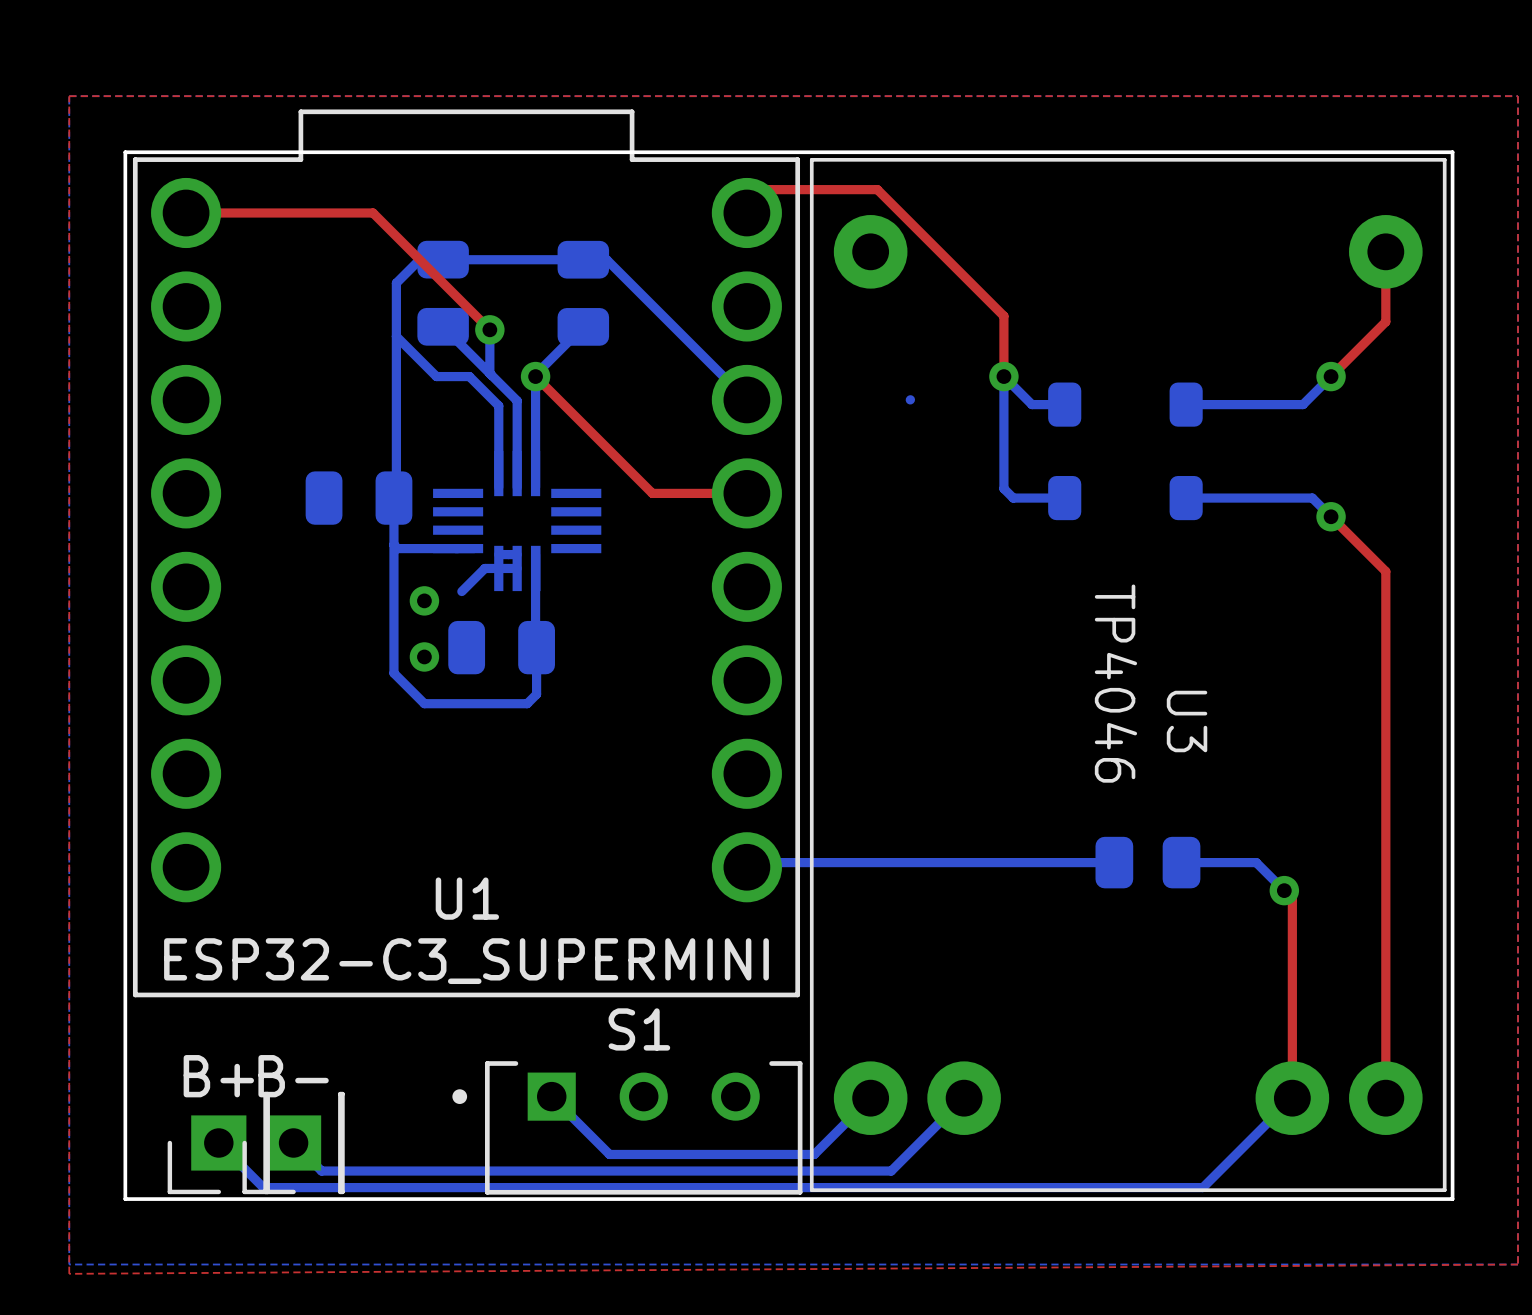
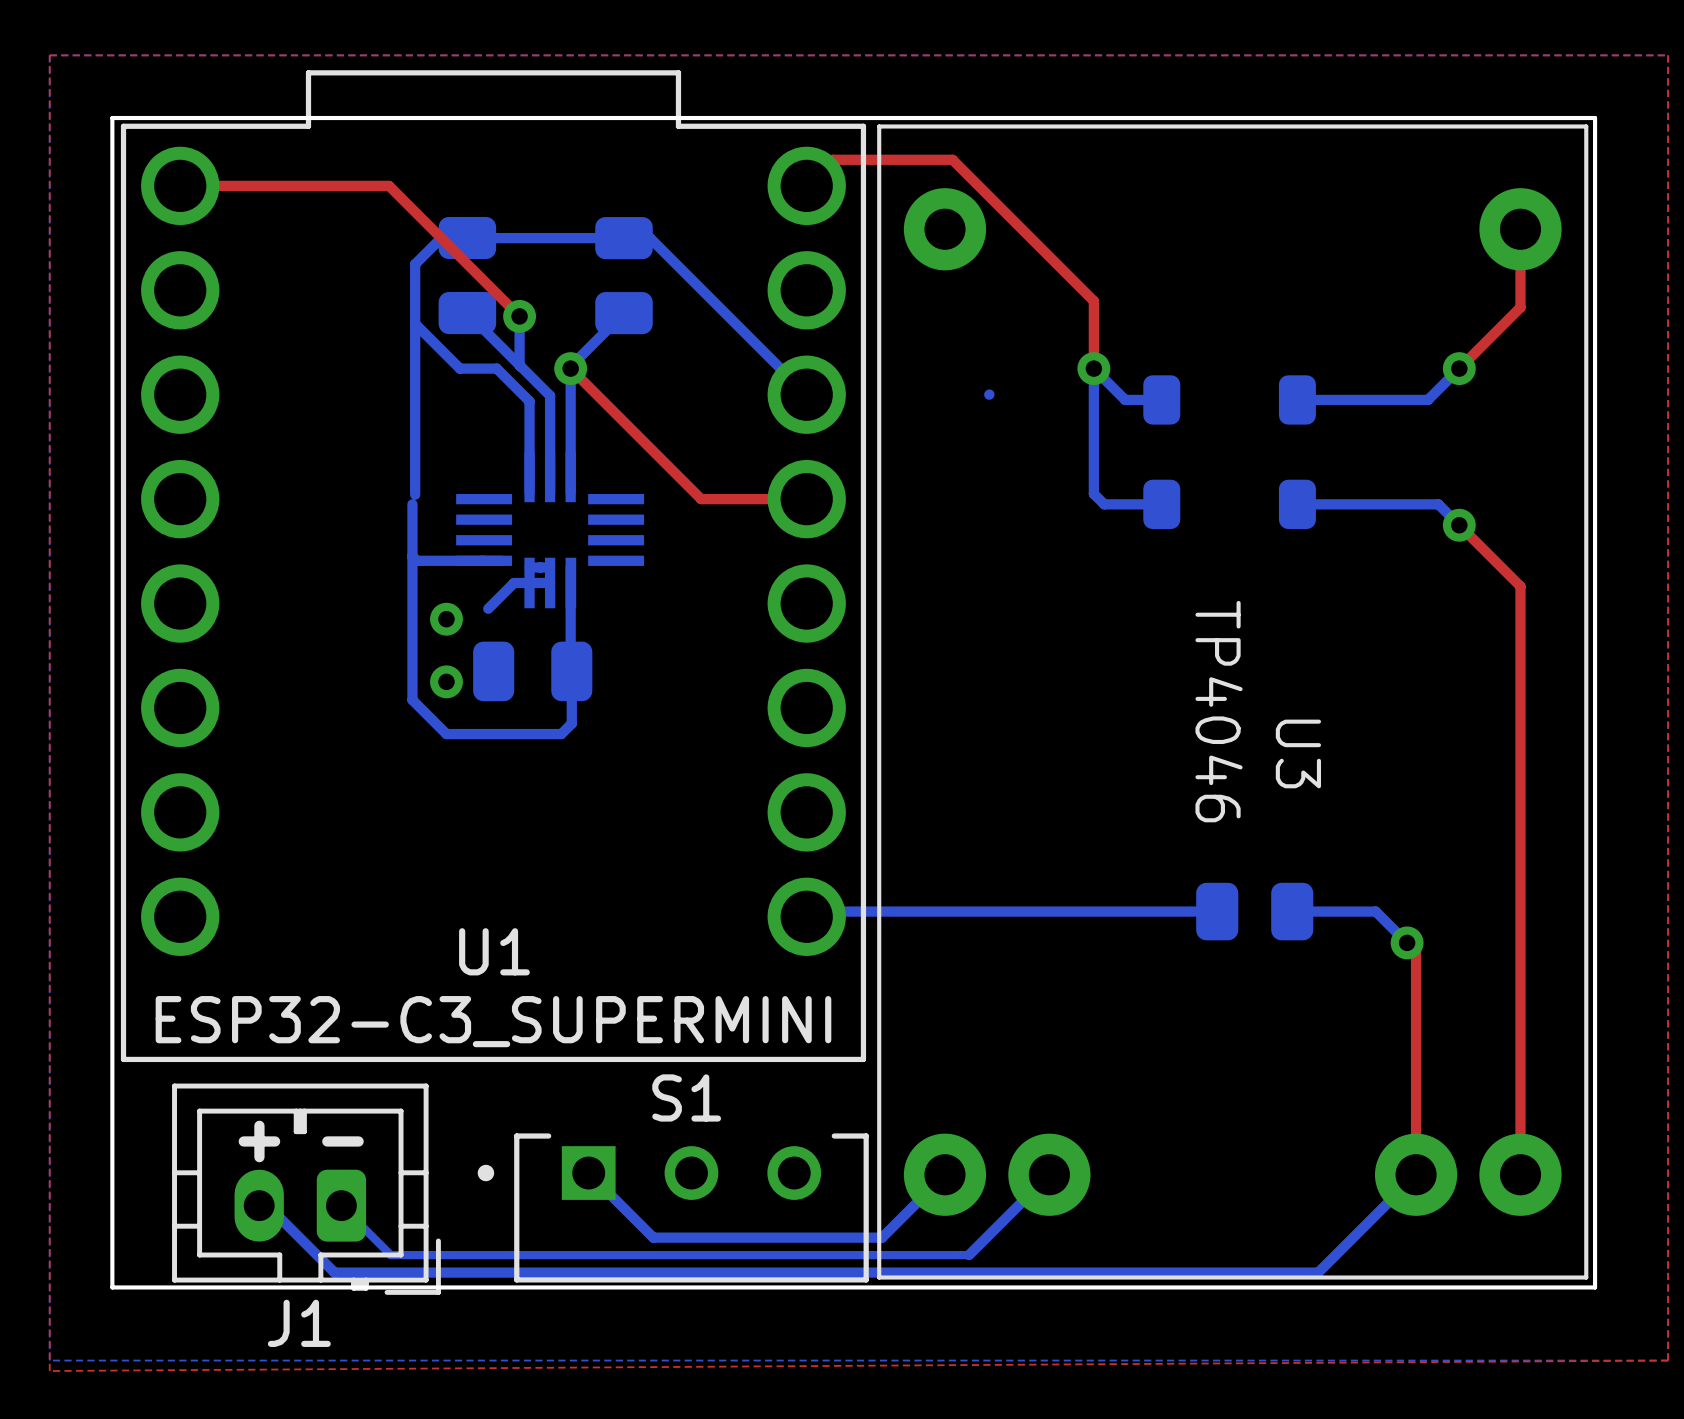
part: (359, 498) -> none
text: none -> + (259, 1141)
text: none -> - (342, 1141)
J1: none -> (306, 1189)
bottom track: (218, 1142) (263, 1187) (1202, 1187) (1204, 1185) -> (259, 1205) (267, 1205) (334, 1272) (1318, 1272)
B+: (218, 1142) -> none
bottom track: (293, 1142) (321, 1171) (892, 1170) -> (341, 1205) (390, 1255) (969, 1255)
B-: (293, 1142) -> none

